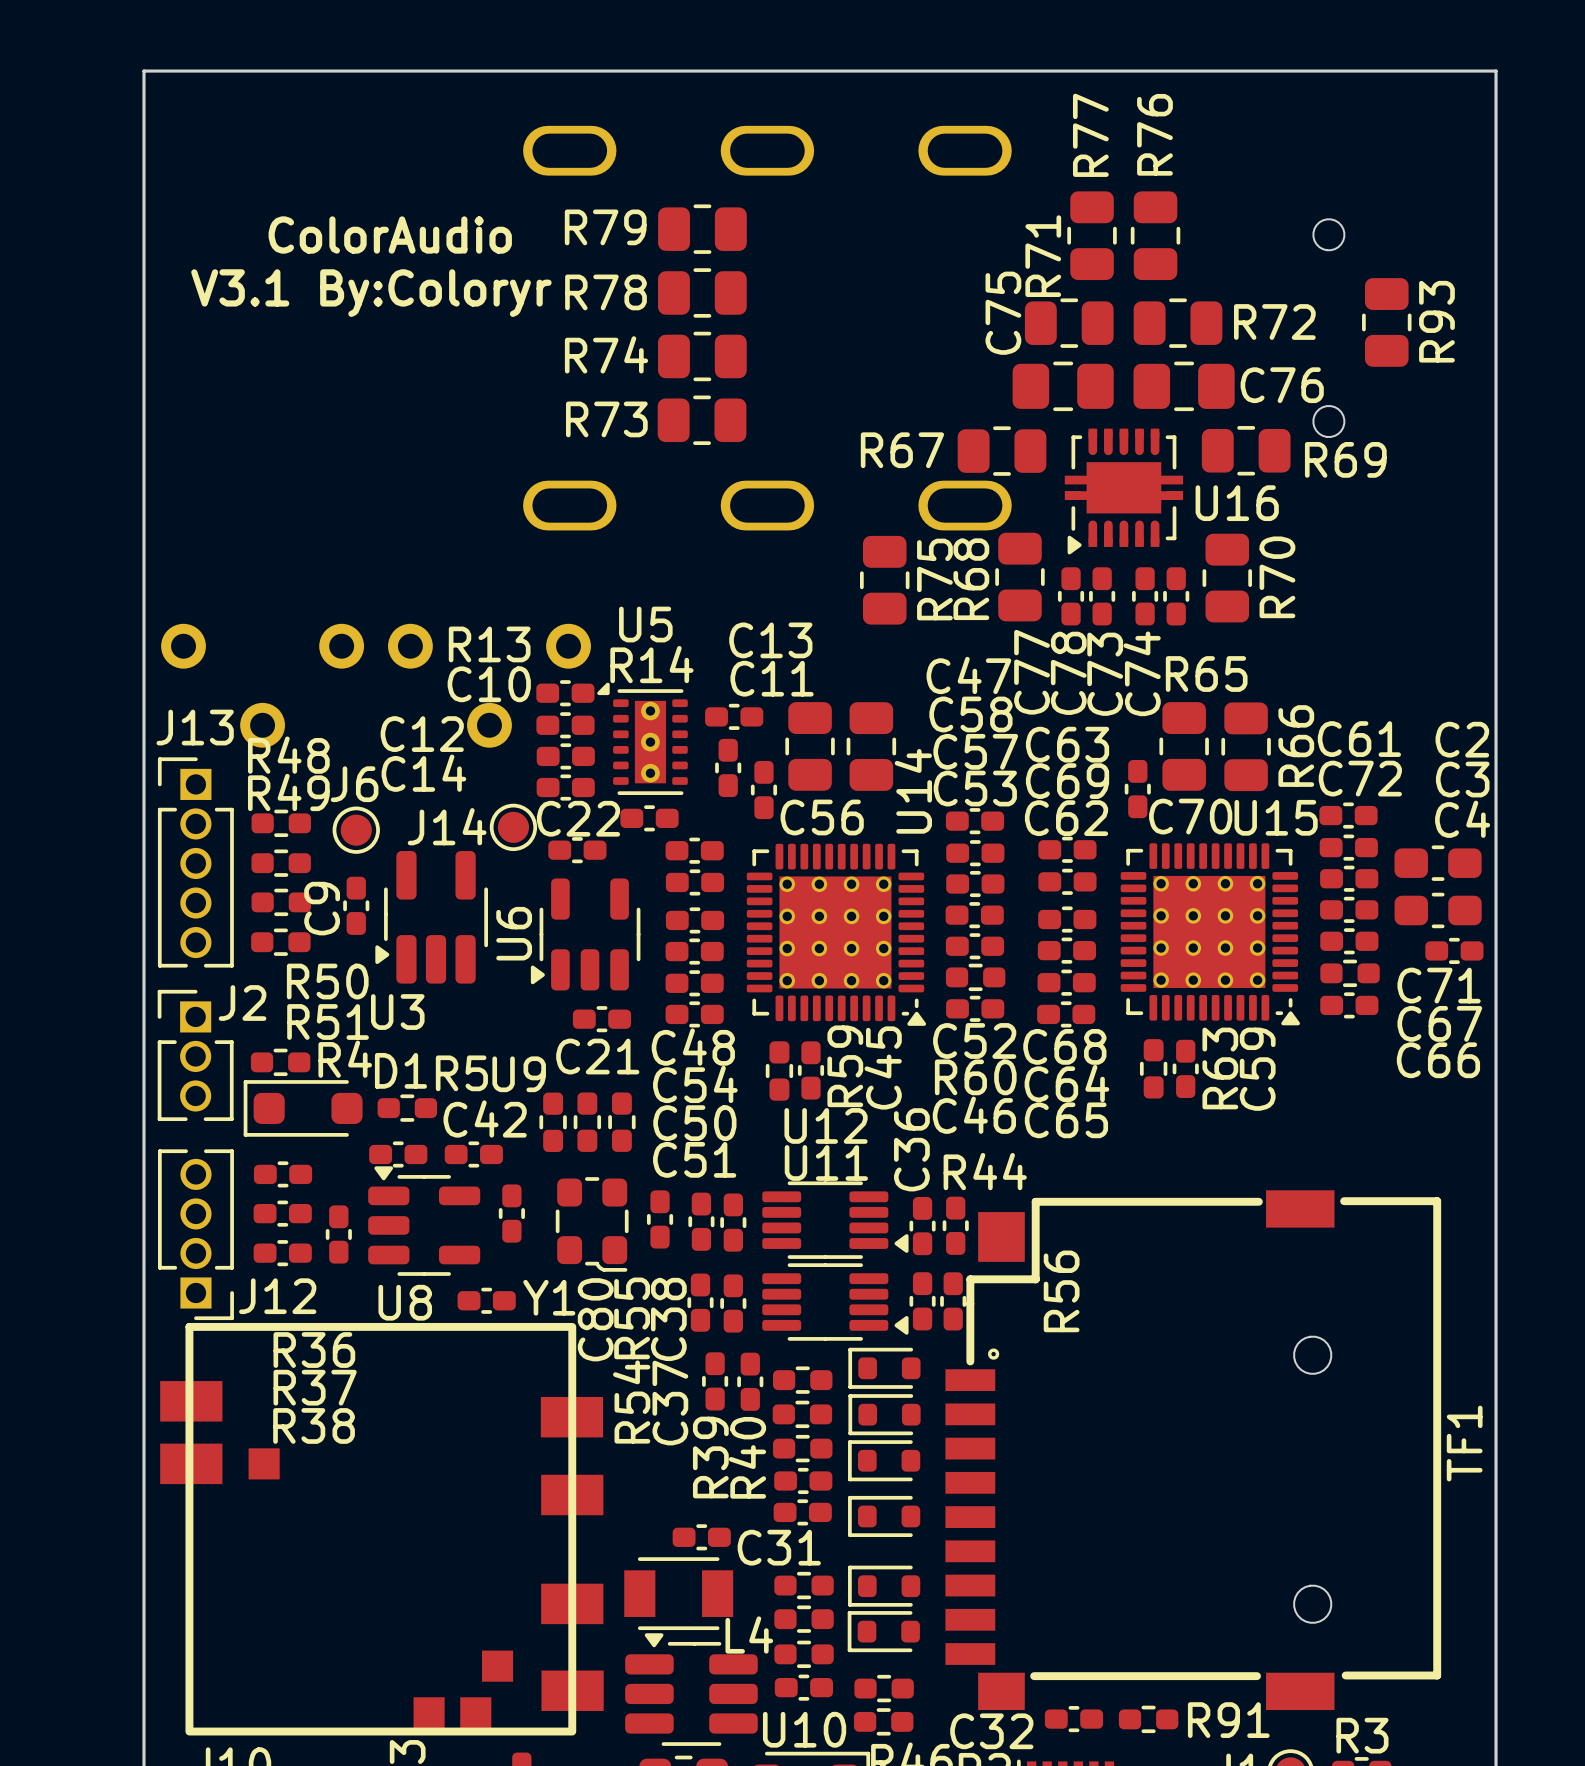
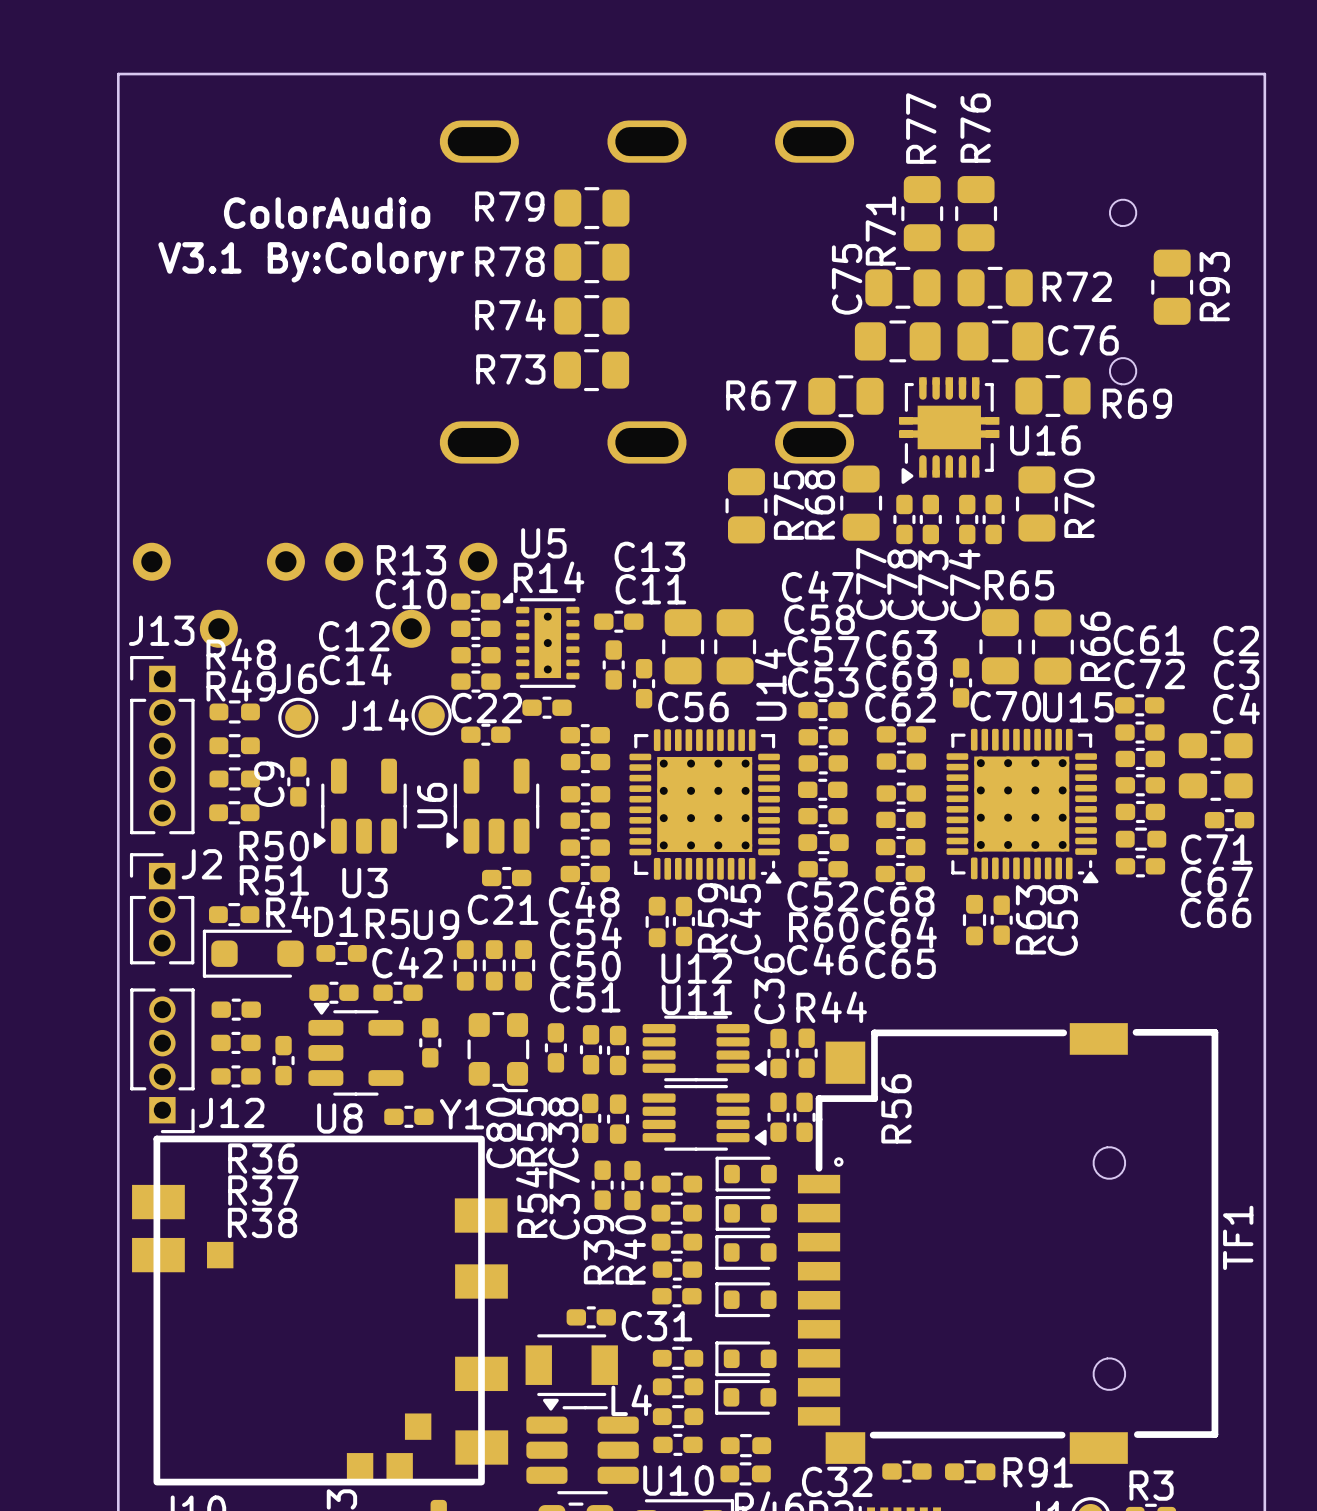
U3 footprint: [375, 851, 488, 984] -> [313, 758, 407, 854]
U3 name position: U3 (397, 1012) -> U3 (364, 883)

